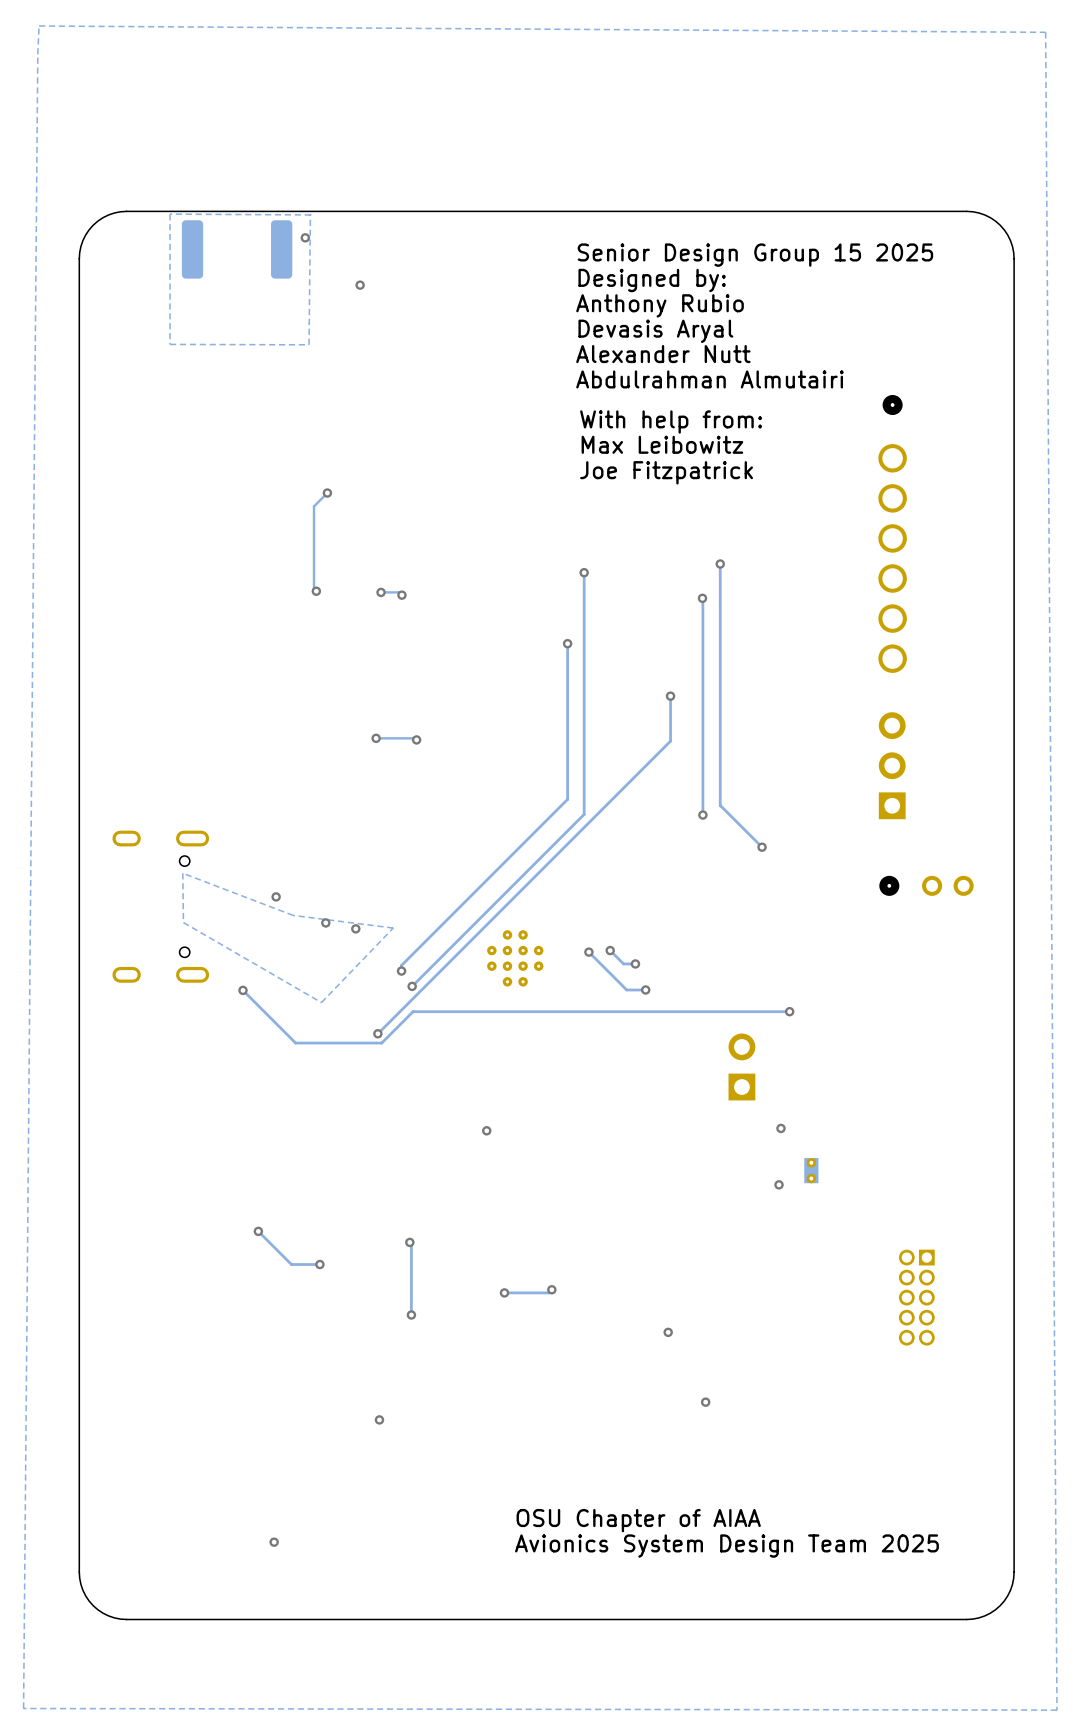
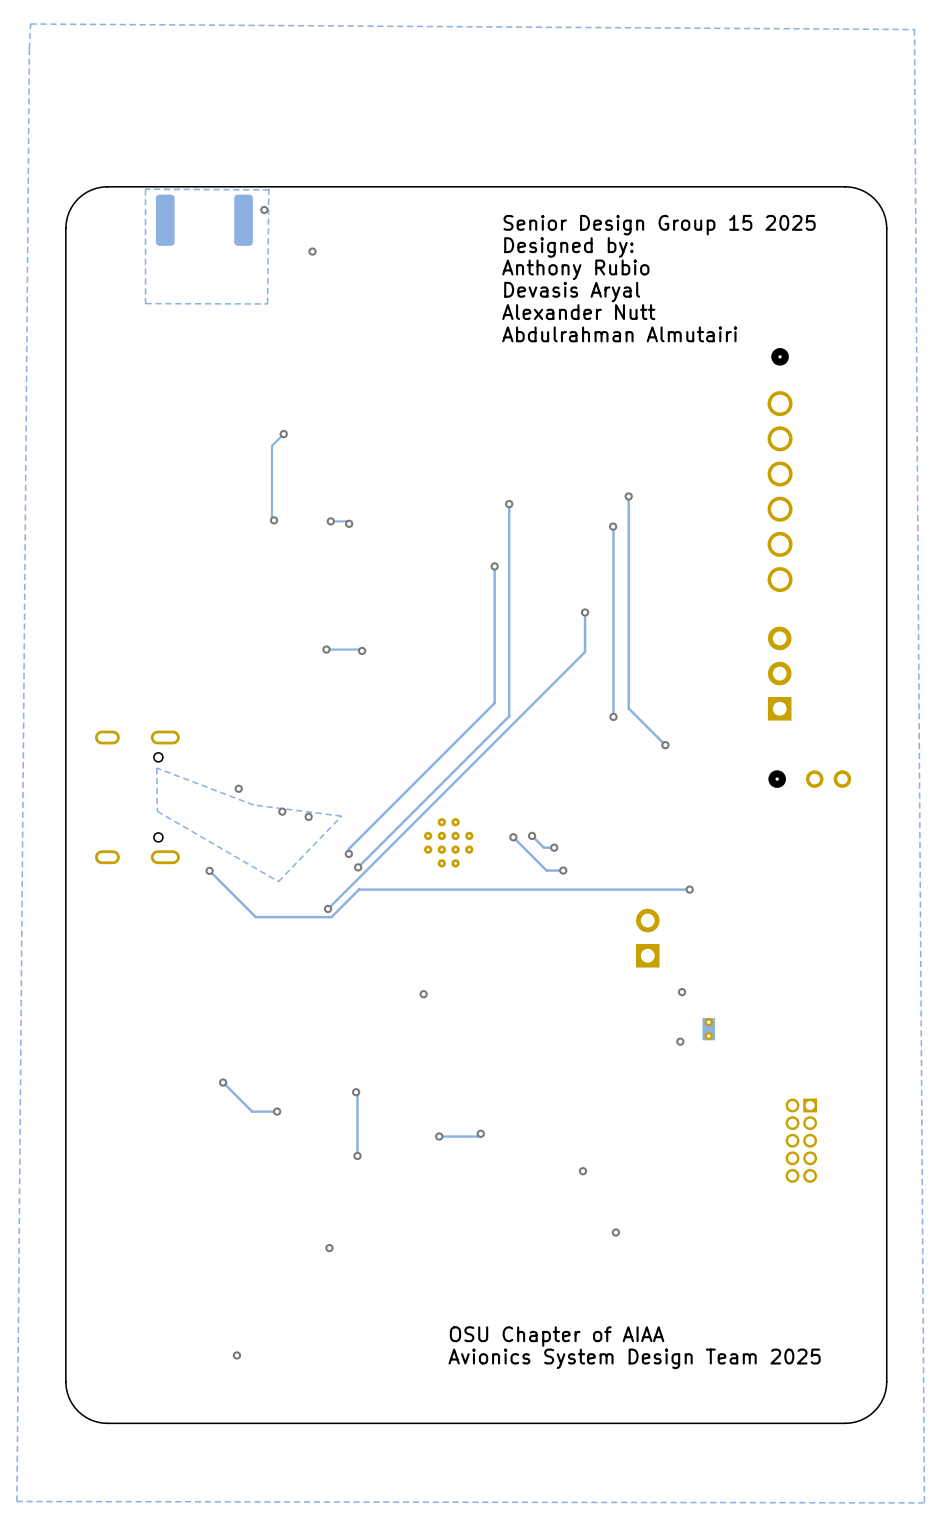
text: With help from: (671, 422) -> none
text: Max Leibowitz (662, 444) -> none
text: Joe Fitzpatrick (666, 472) -> none

